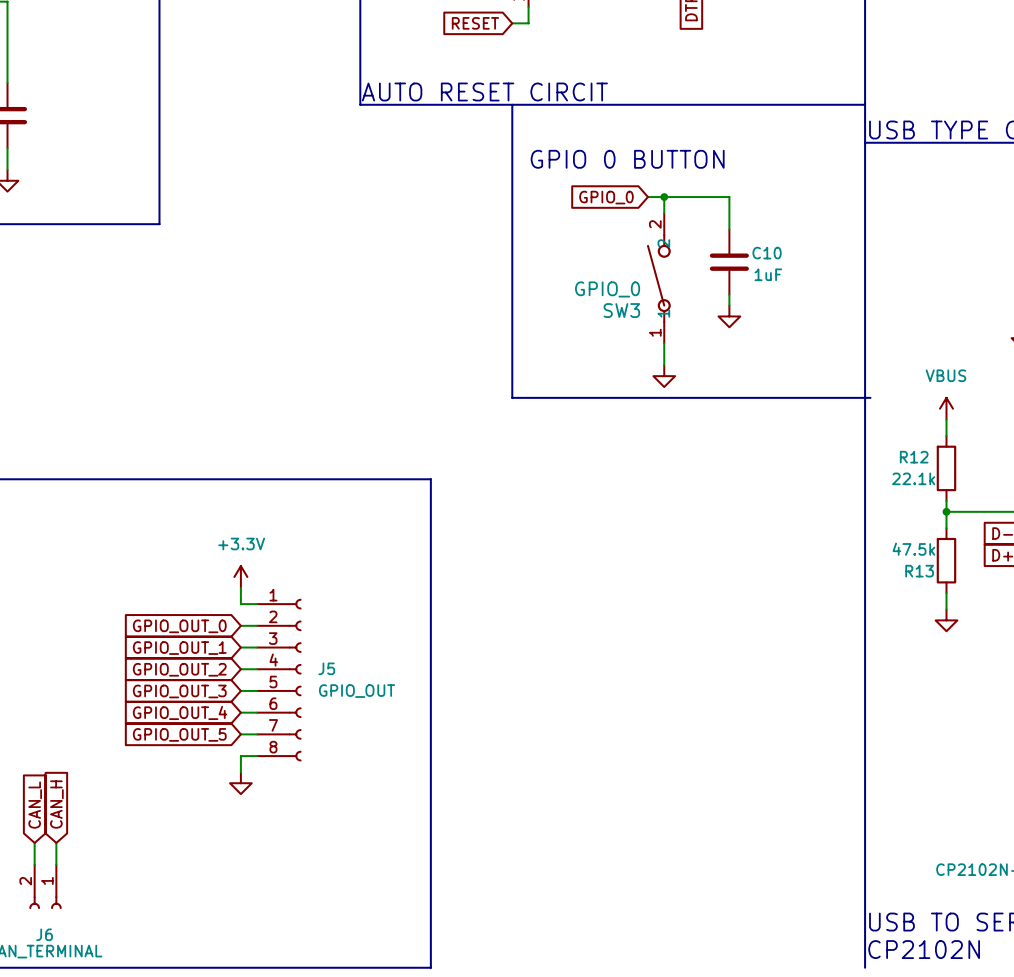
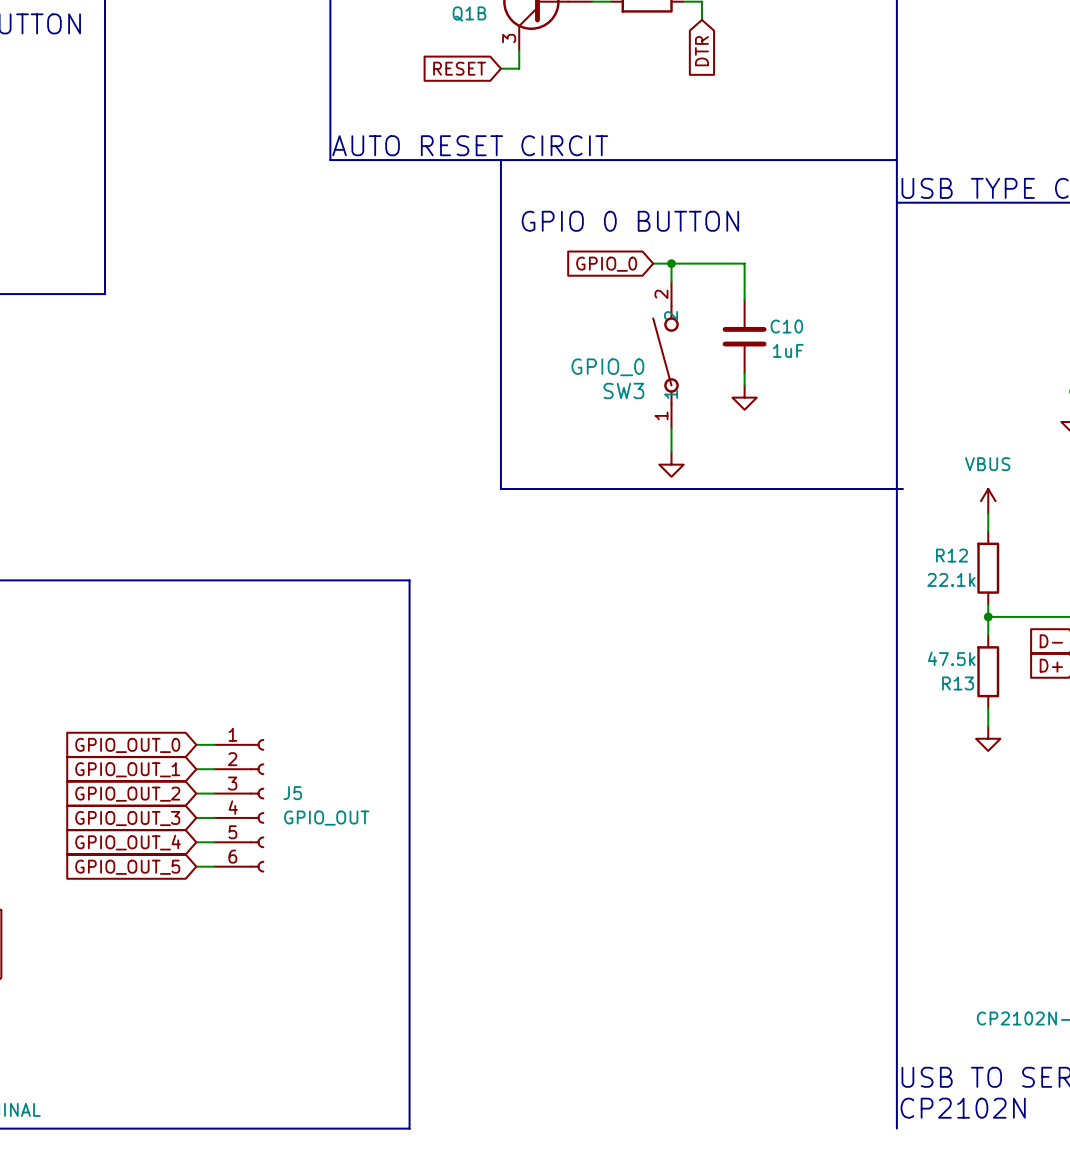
power symbol: +3.3V (240, 576) -> none
wire: (240, 587) (240, 604) (257, 604) -> none
J5 symbol: [257, 599, 302, 762] -> [214, 739, 265, 873]
wire: (257, 756) (240, 756) (240, 772) -> none
power symbol: (240, 783) -> none

